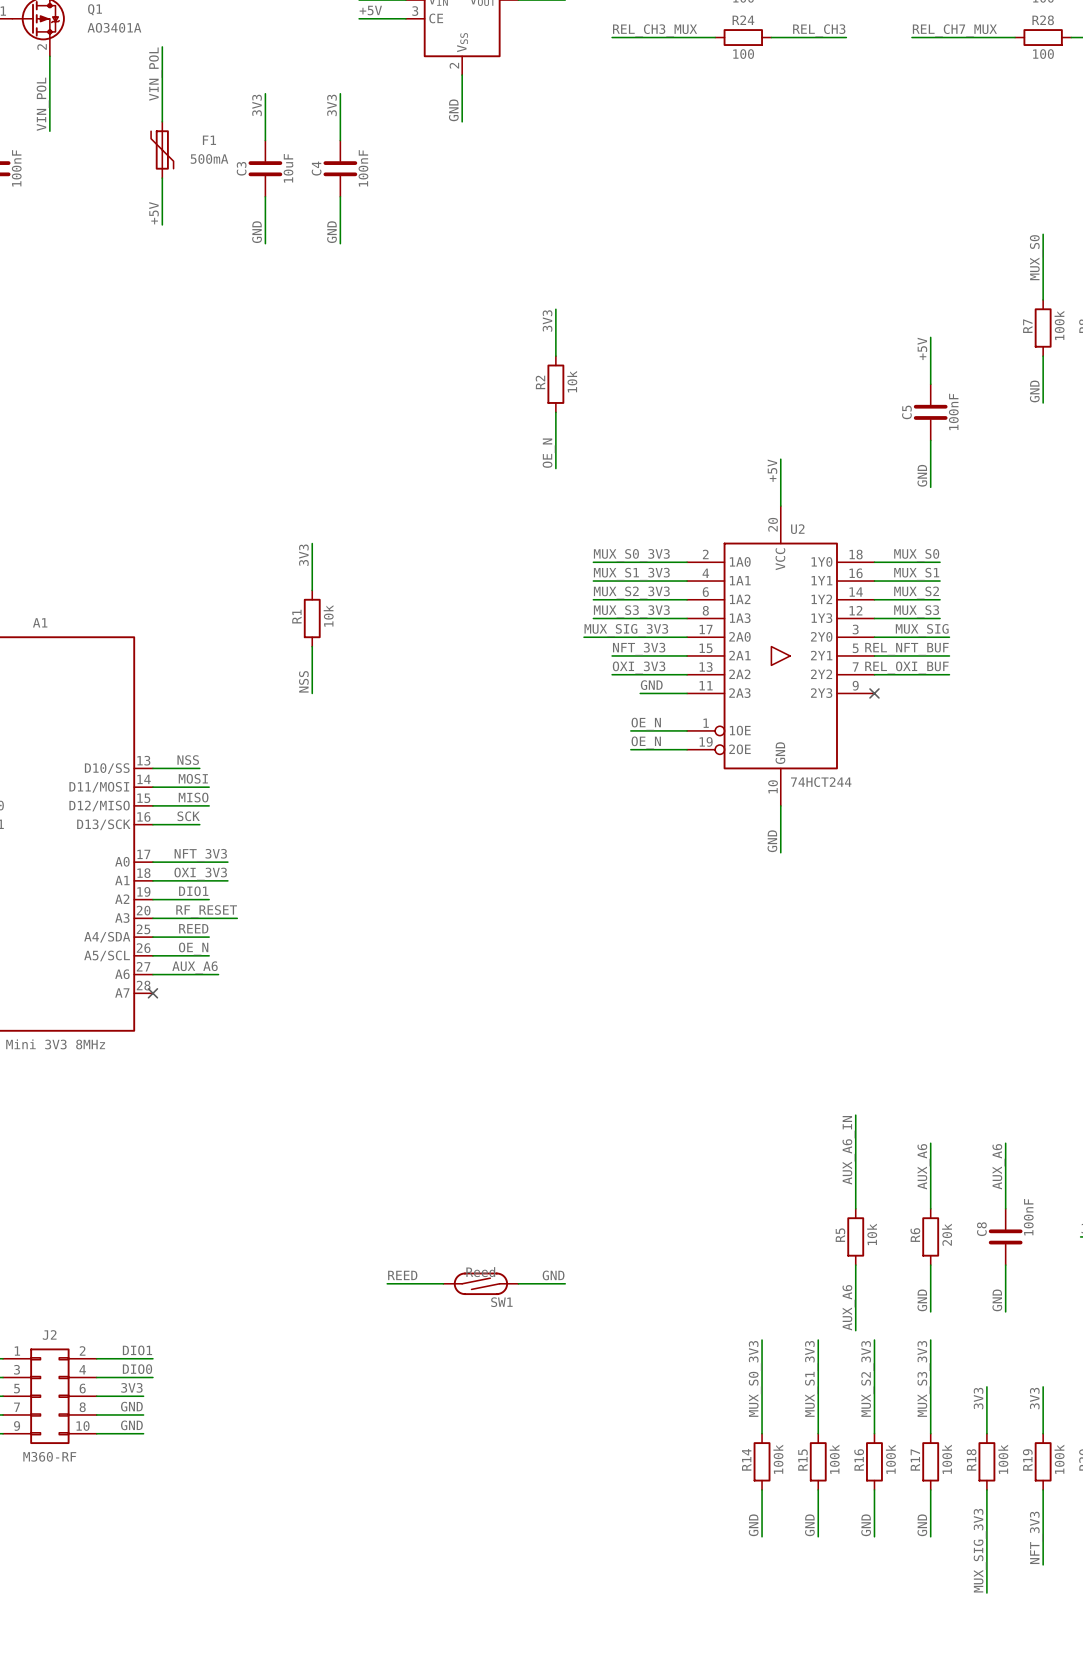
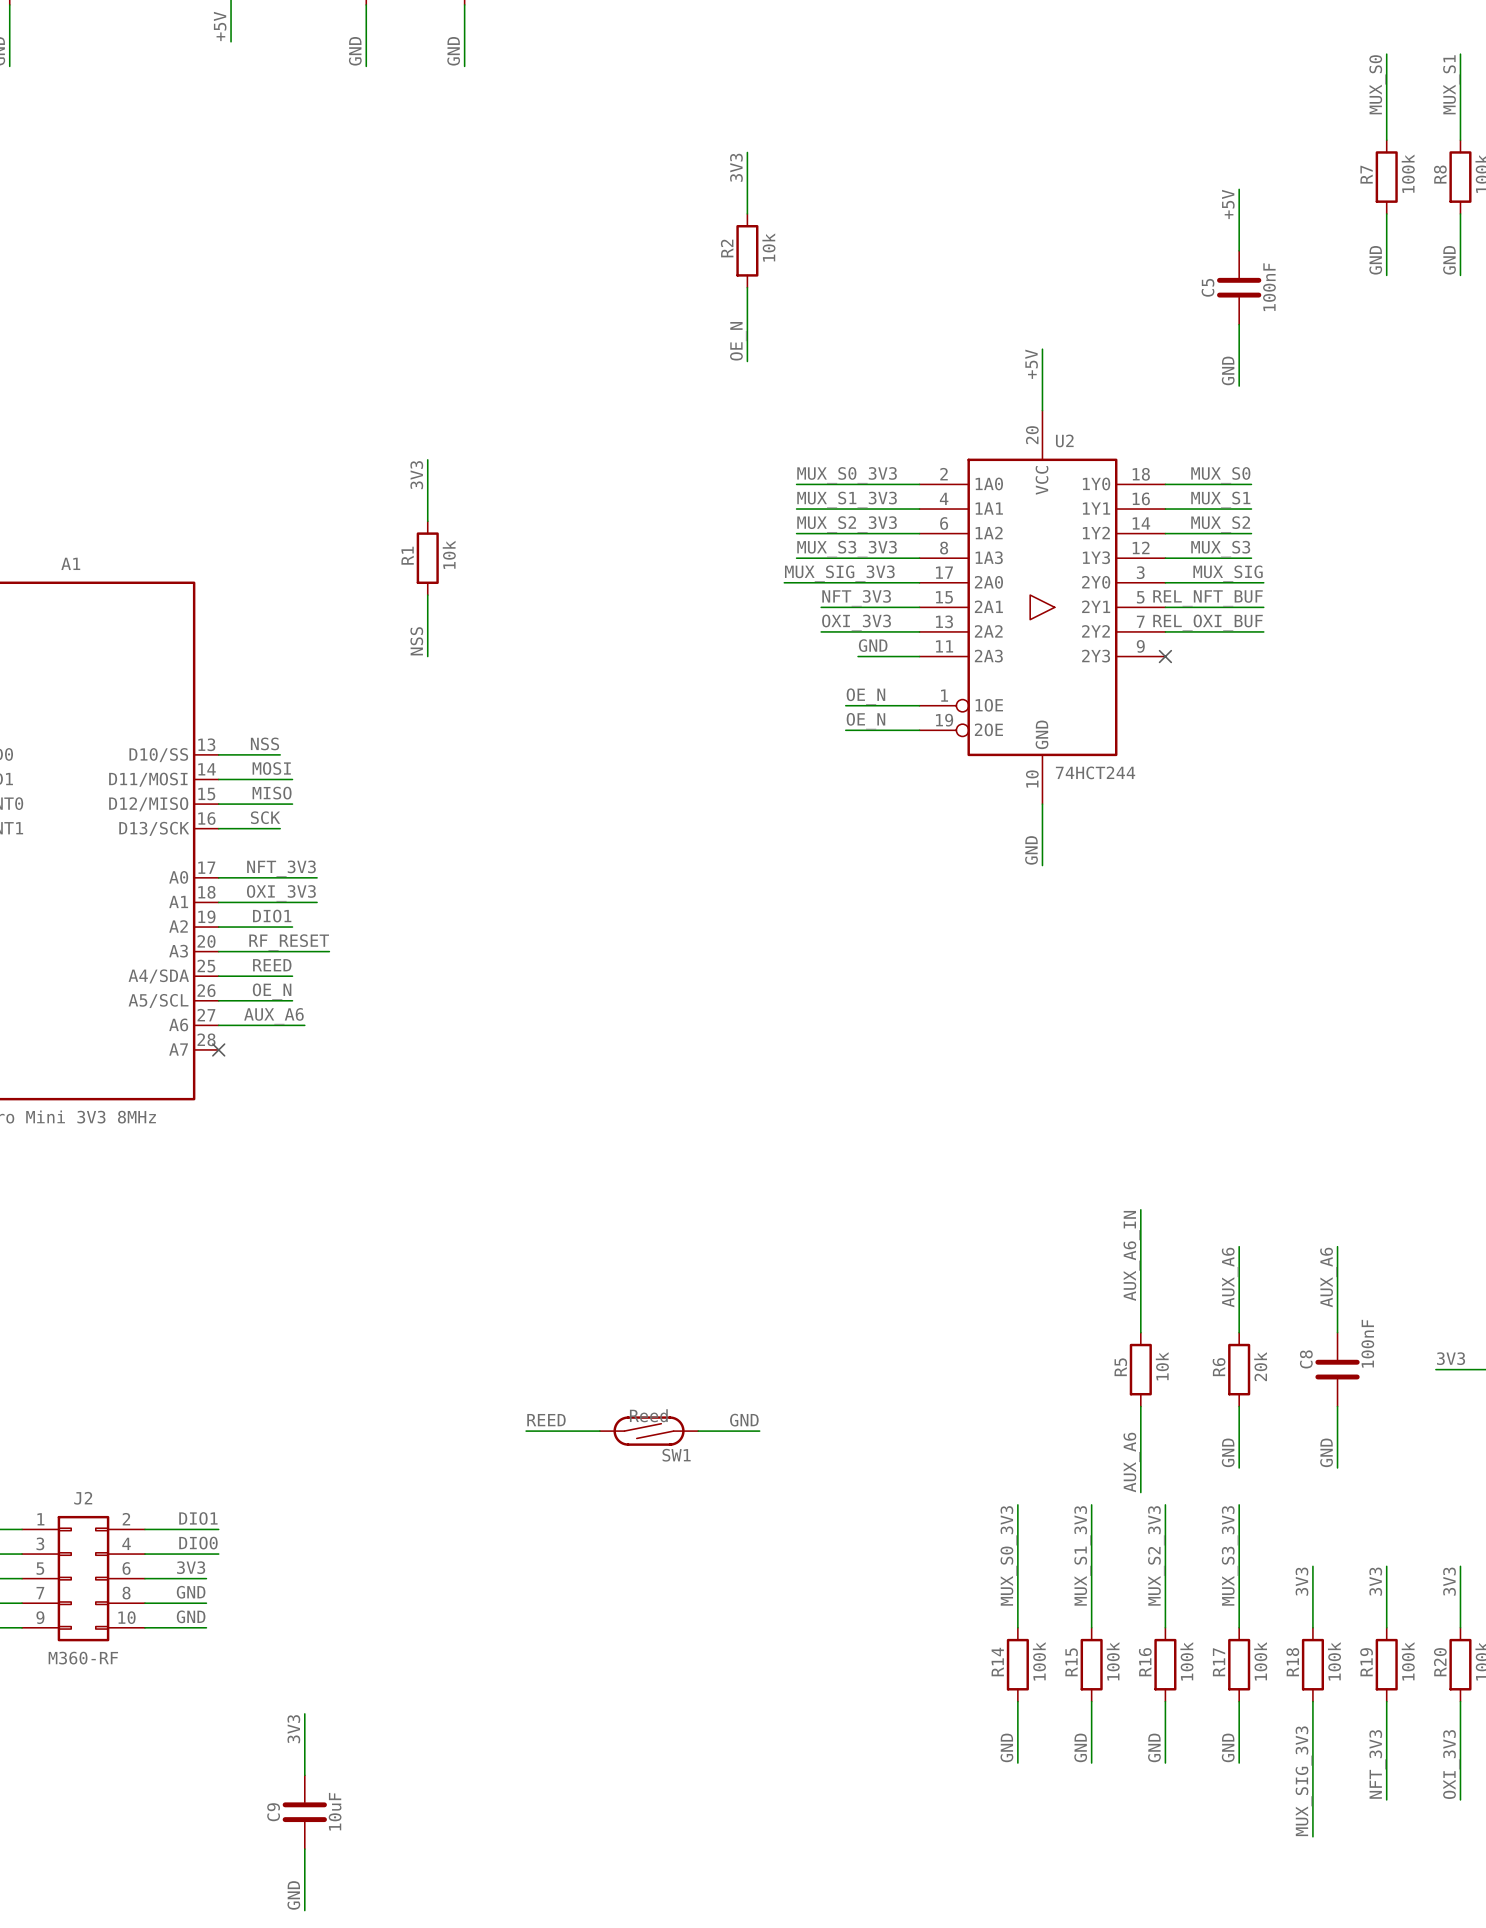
wire: none -> (304, 1713) (304, 1775)
label: none -> 3V3 (293, 1729)
C9: none -> 10uF (304, 1812)
wire: none -> (304, 1849) (304, 1910)
label: none -> GND (293, 1895)

